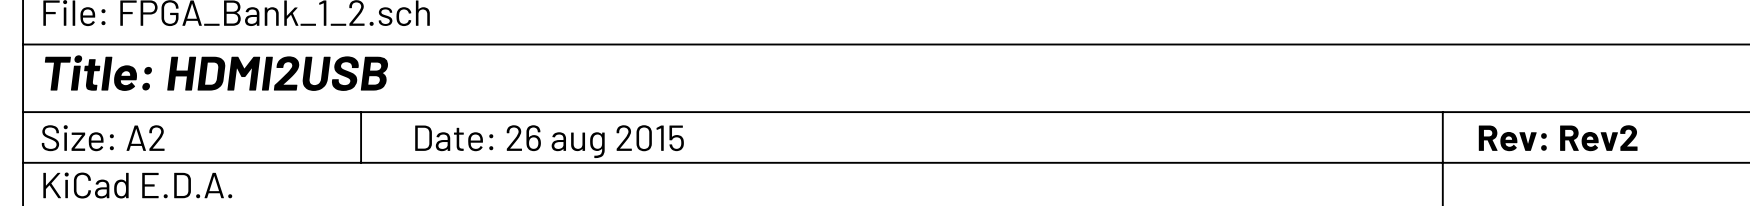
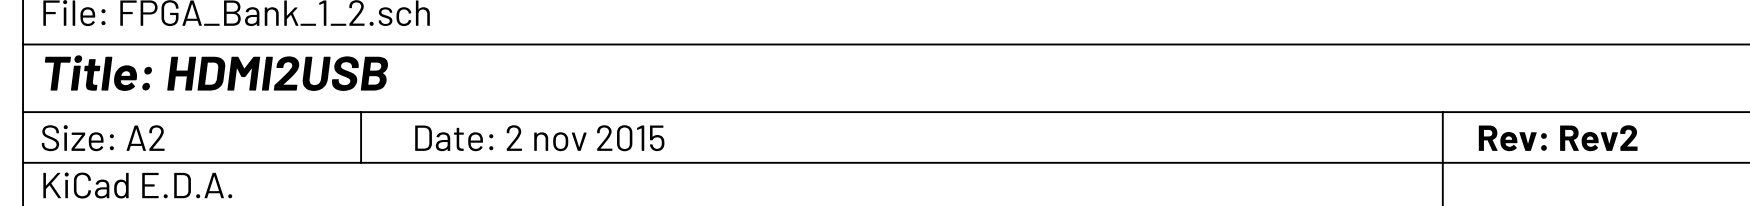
title block: Date: 26 aug 2015 (549, 141) -> Date: 2 nov 2015 (539, 138)

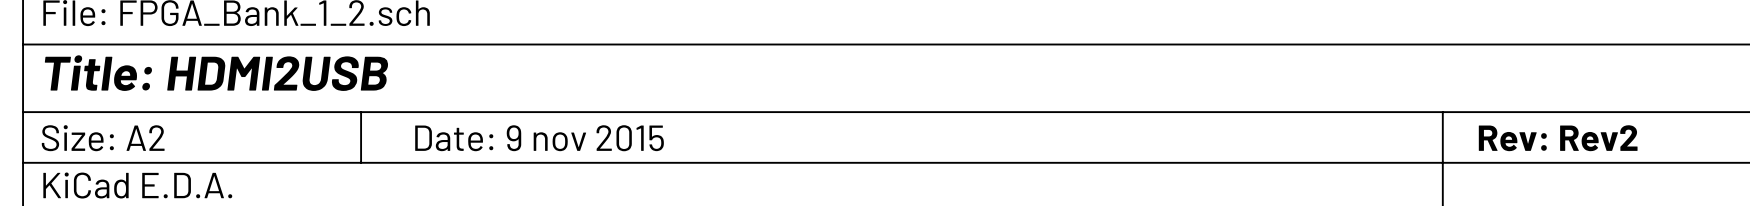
title block: Date: 2 nov 2015 (539, 138) -> Date: 9 nov 2015 (539, 138)

